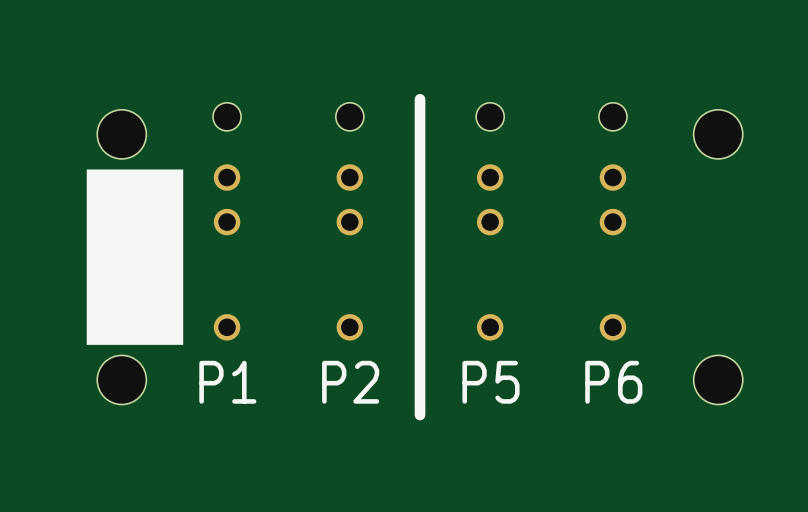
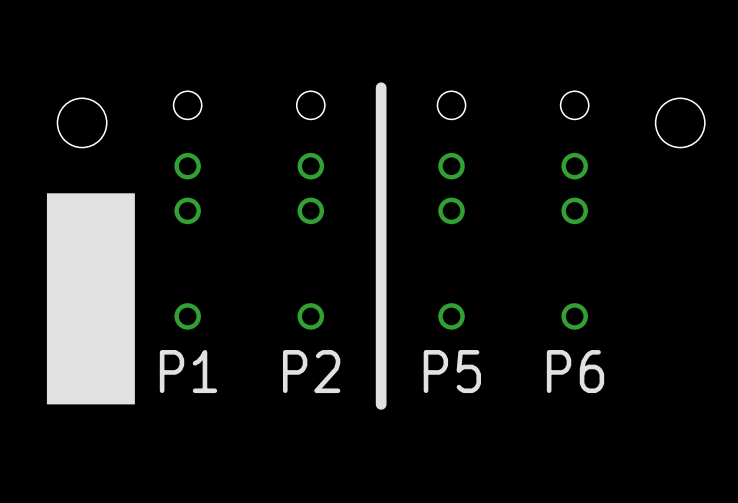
drawing: [86, 169, 184, 345] -> none
drawing: none -> [46, 193, 135, 405]
hole: (121, 379) -> none
hole: (718, 379) -> none

